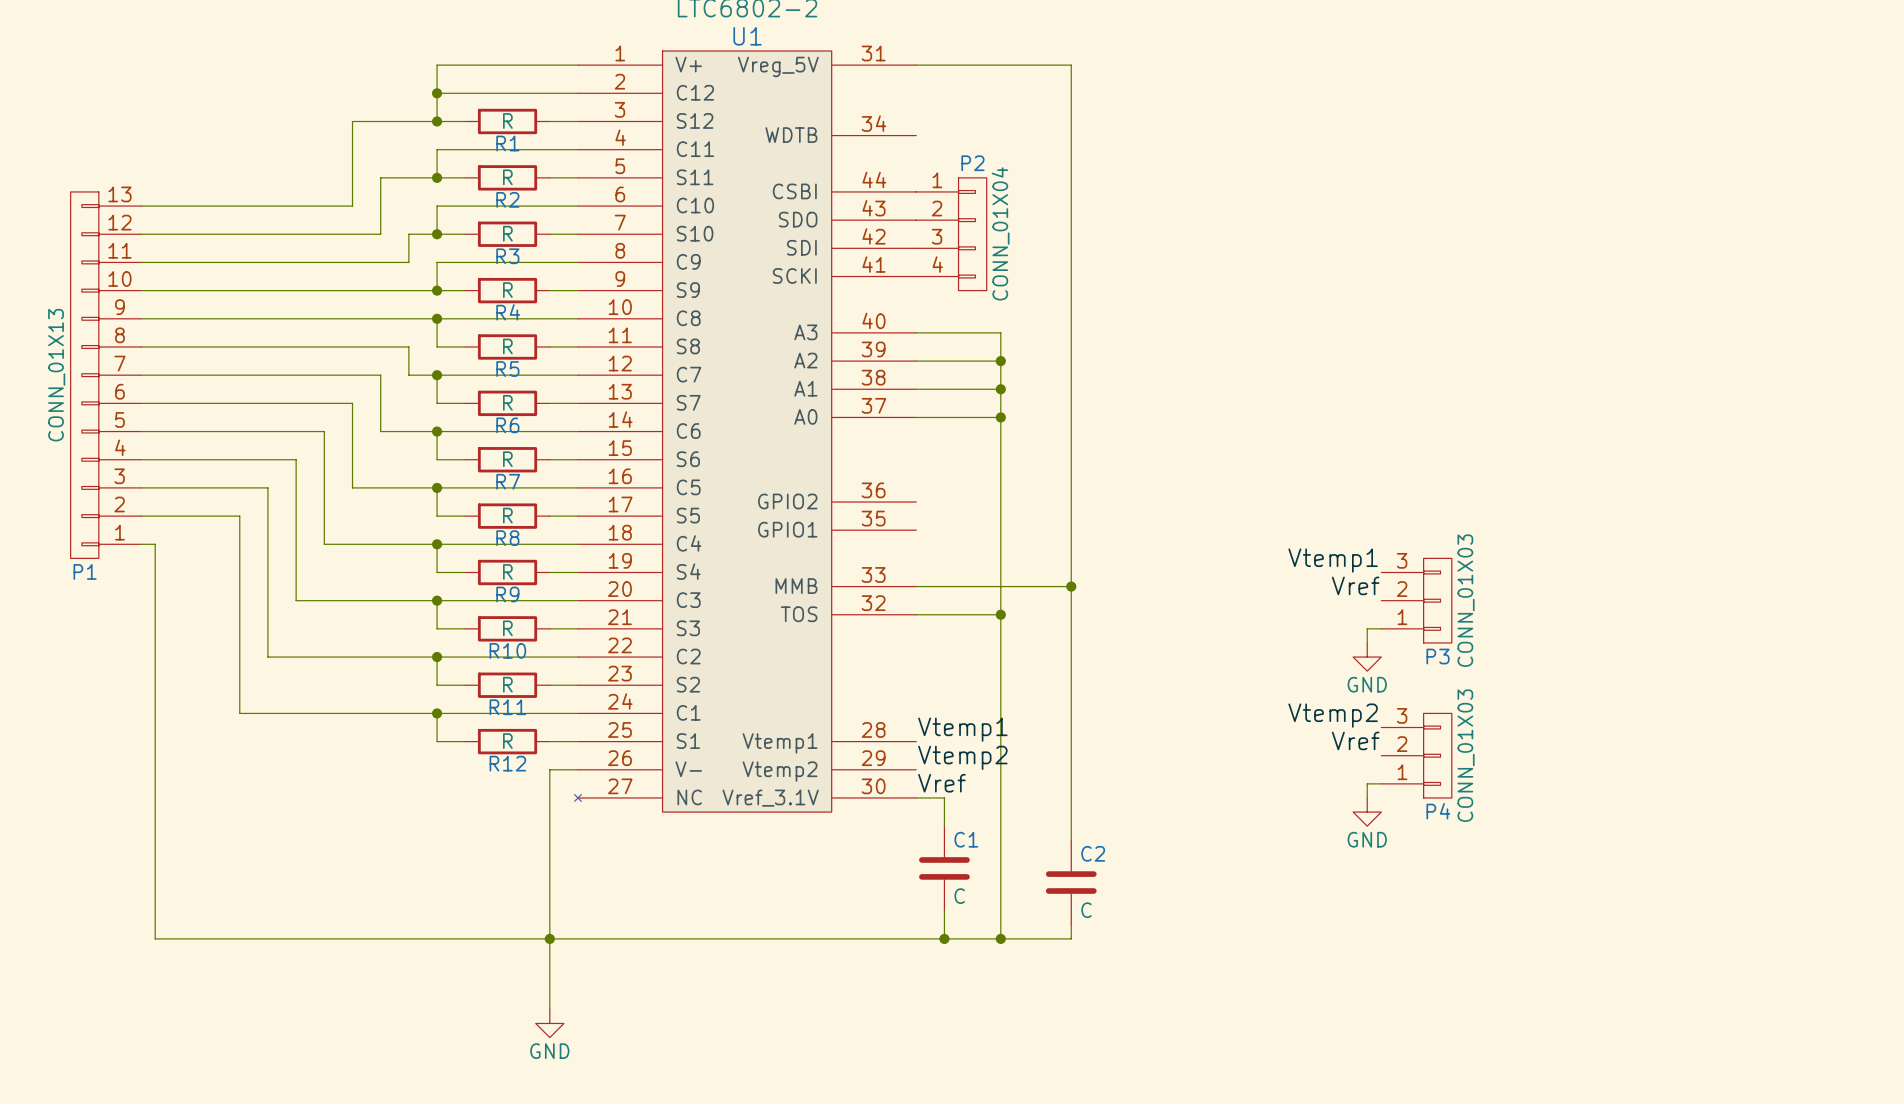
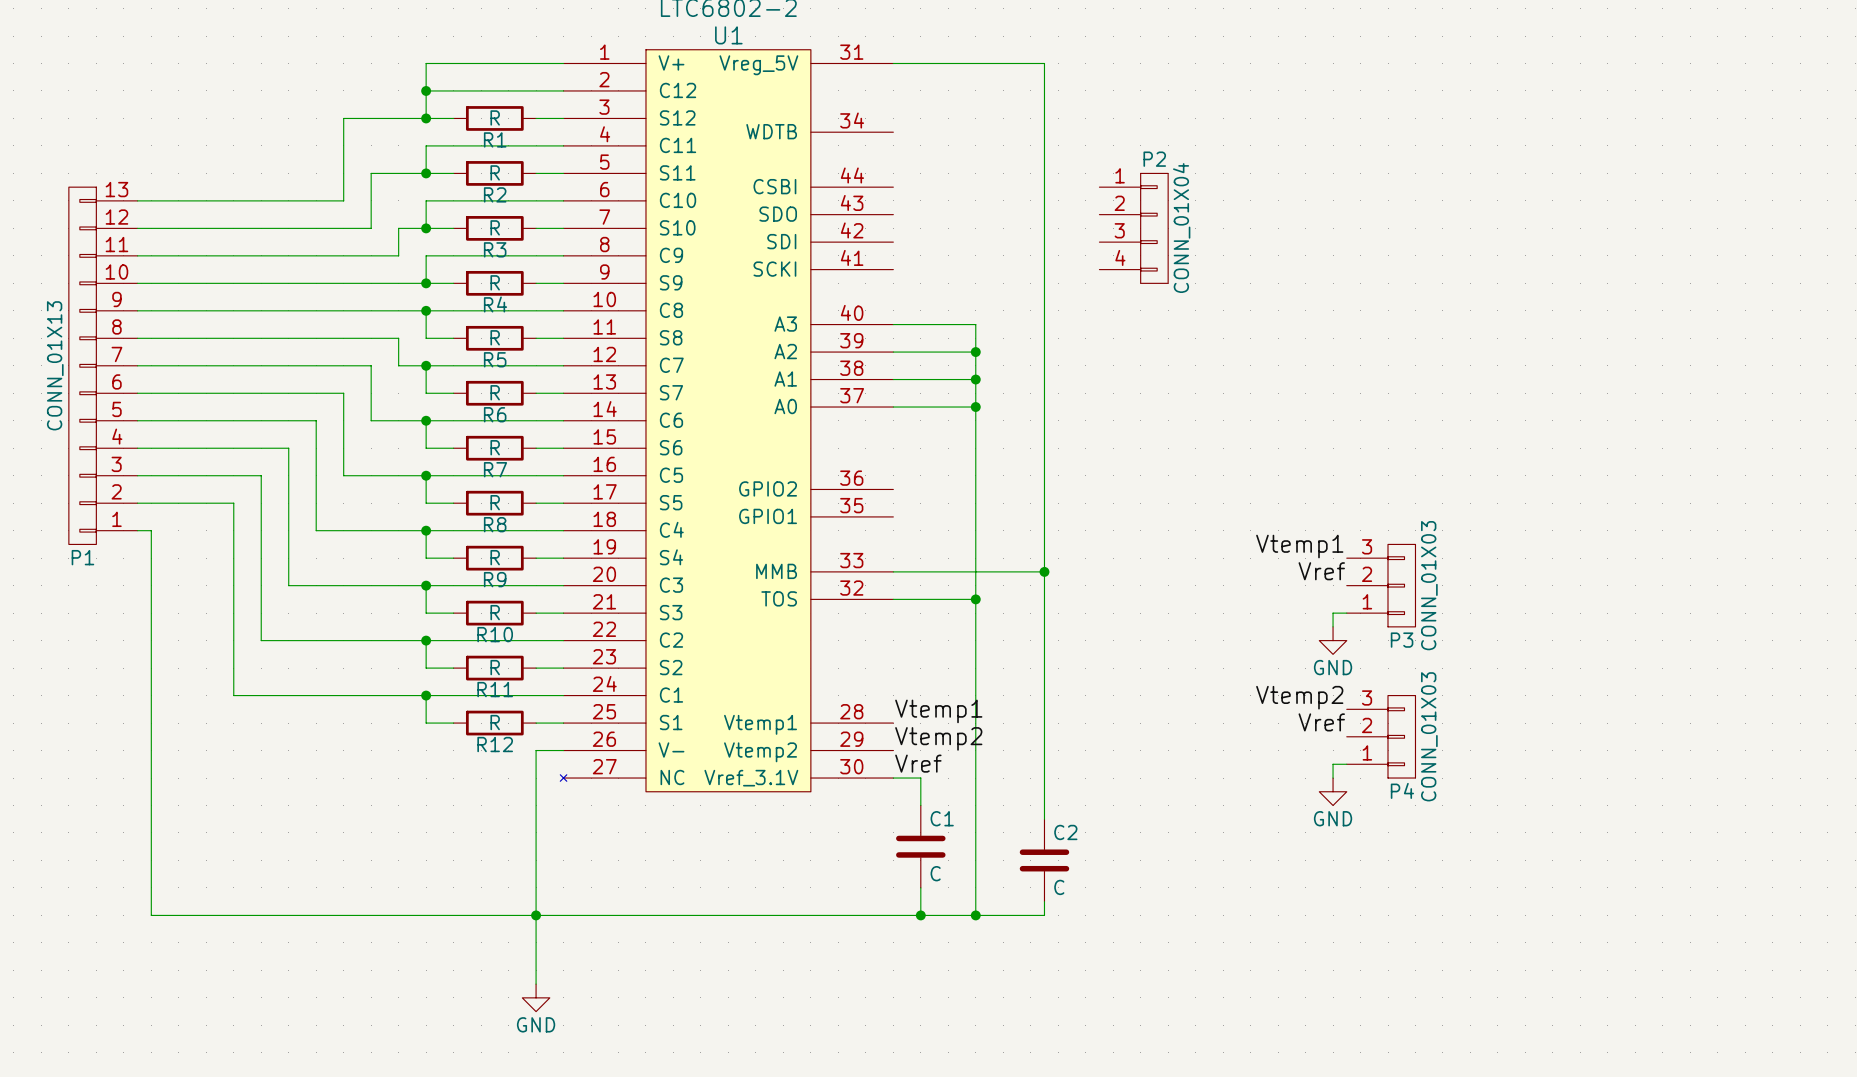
P2 position: (951, 234) -> (1133, 228)

